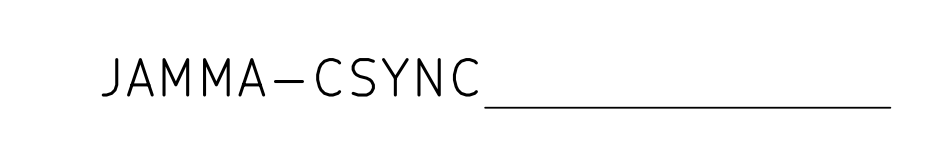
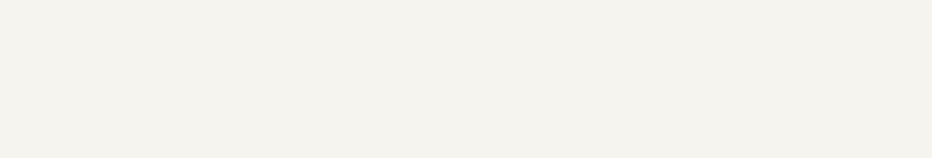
label: JAMMA-CSYNC (289, 77) -> none
wire: (485, 107) (890, 107) -> none

